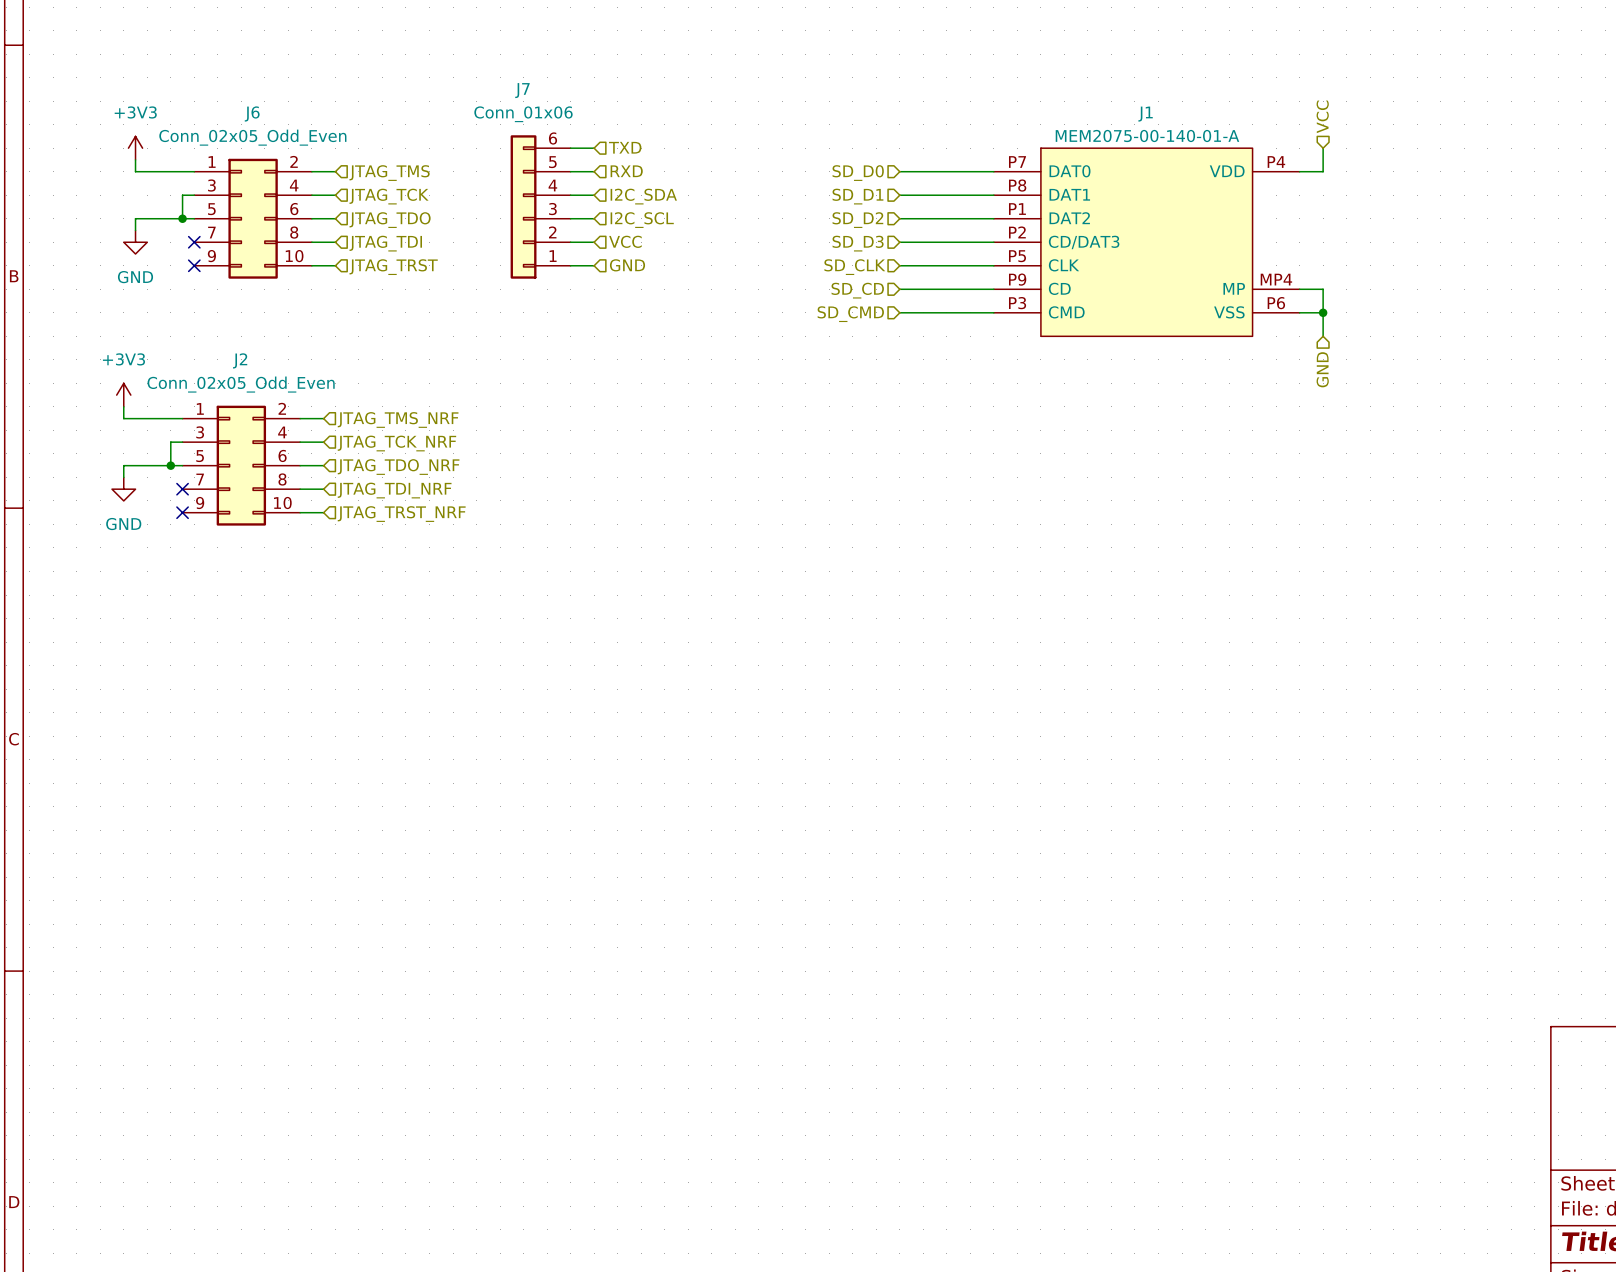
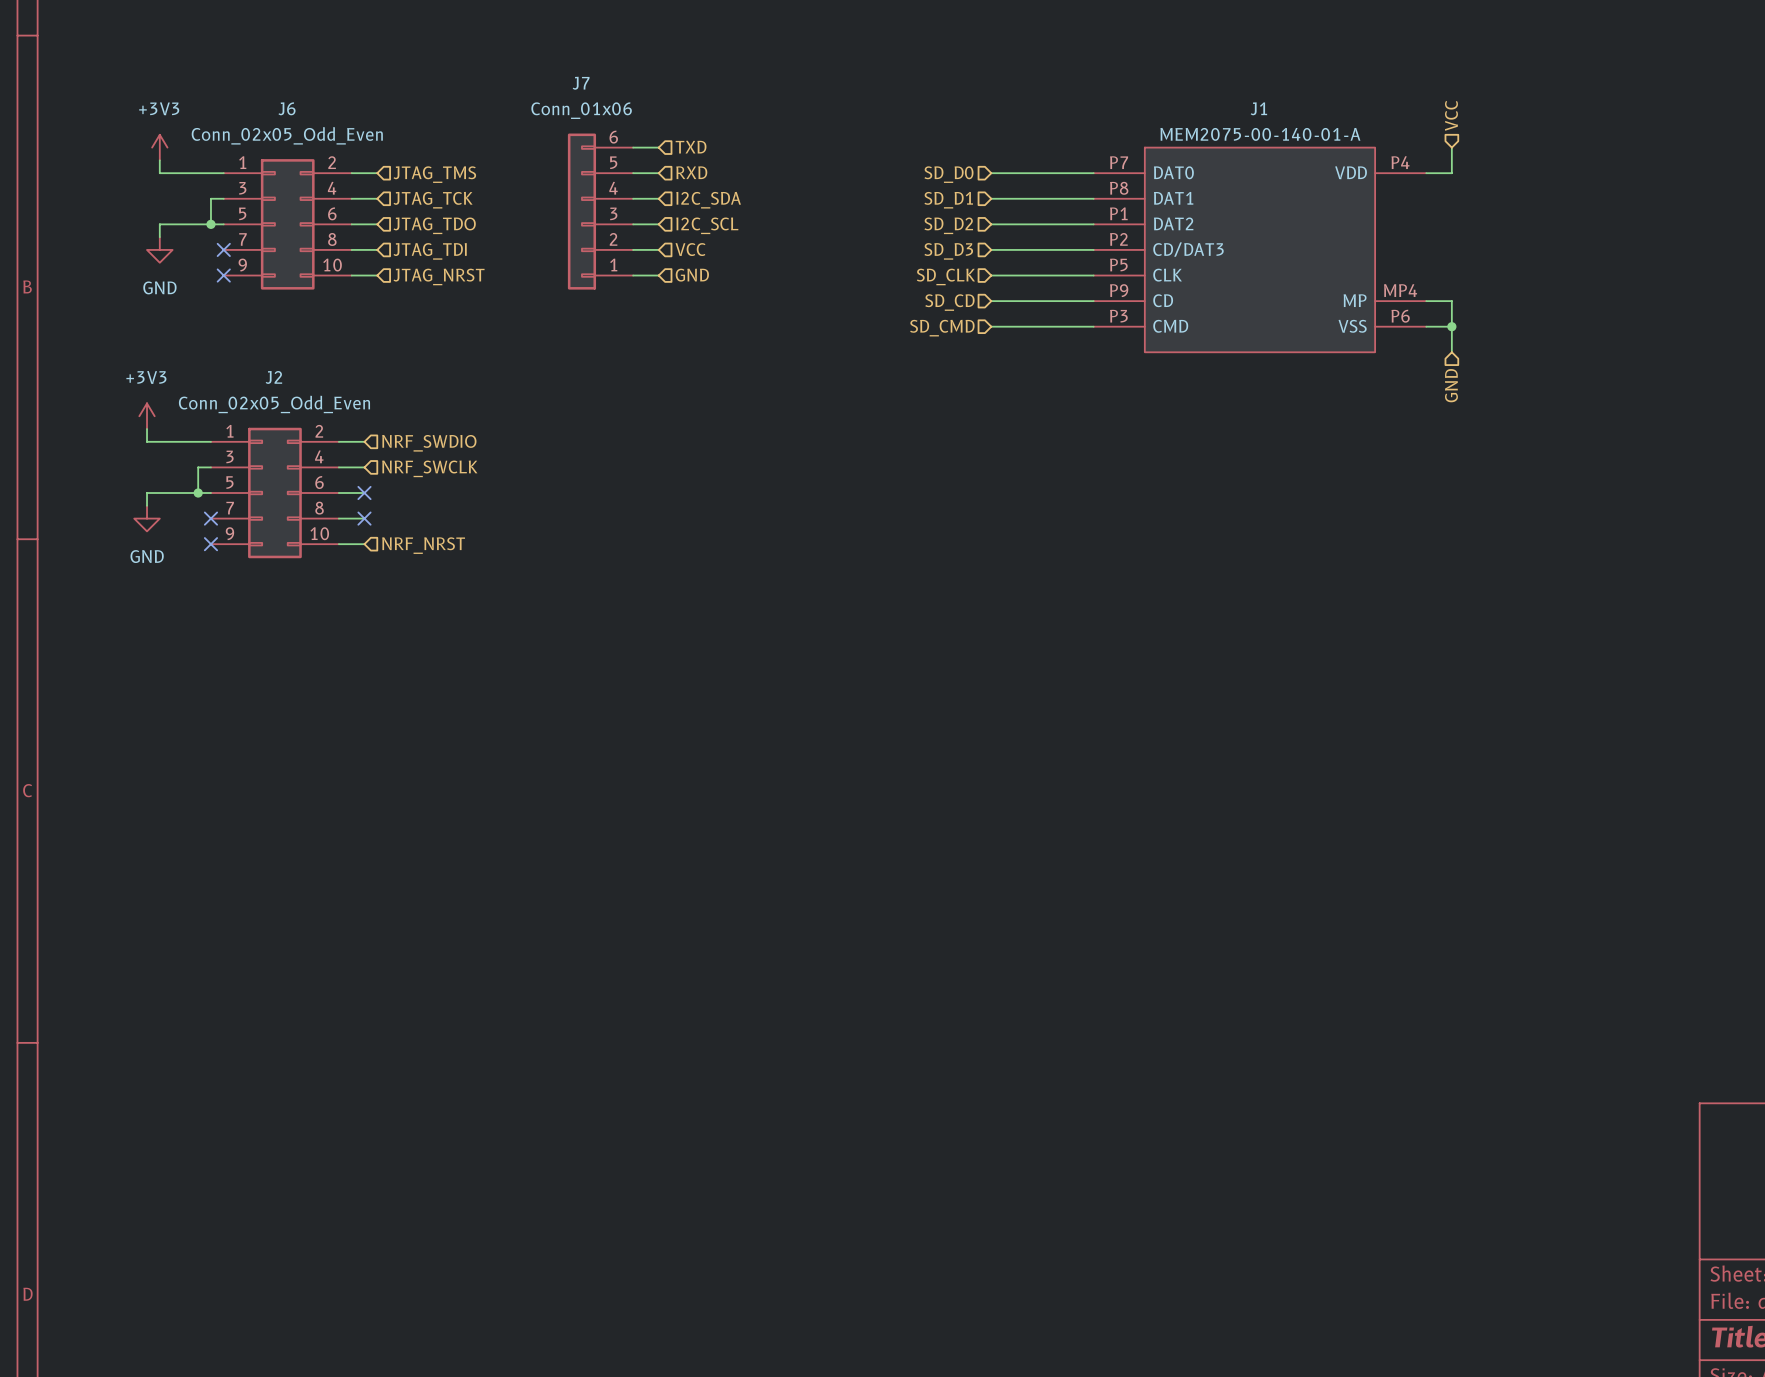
hierarchical label: JTAG_TRST (393, 267) -> JTAG_NRST (439, 276)
hierarchical label: JTAG_TMS_NRF (398, 419) -> NRF_SWDIO (429, 443)
hierarchical label: JTAG_TCK_NRF (396, 443) -> NRF_SWCLK (429, 468)
no-connect mark: none -> (364, 493)
hierarchical label: JTAG_TDO_NRF (398, 467) -> none
no-connect mark: none -> (364, 518)
hierarchical label: JTAG_TDI_NRF (394, 490) -> none
hierarchical label: JTAG_TRST_NRF (401, 514) -> NRF_NRST (423, 545)

